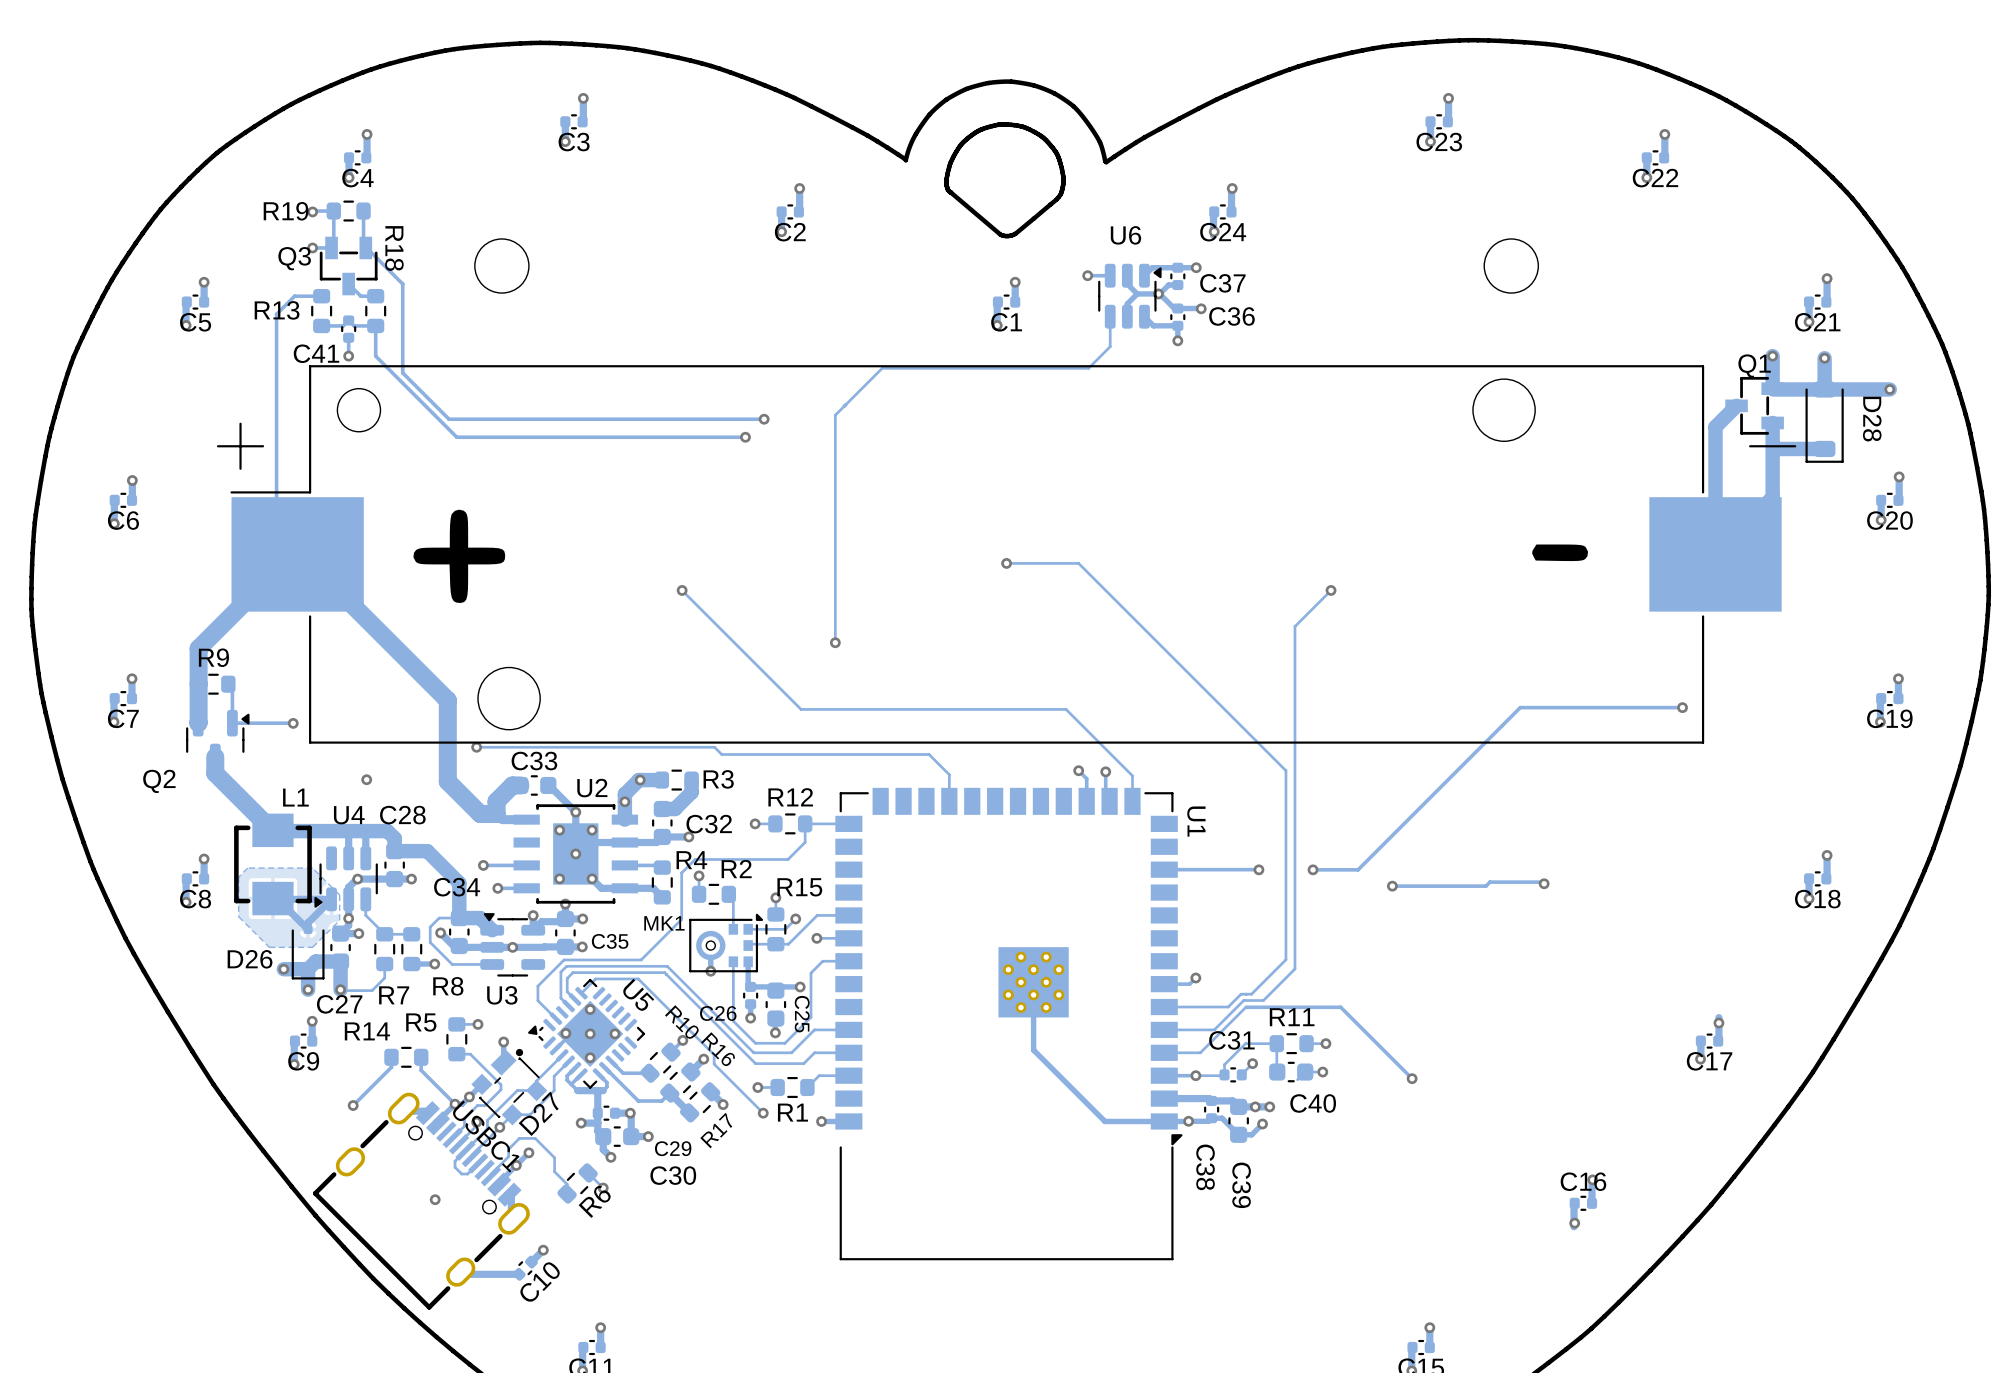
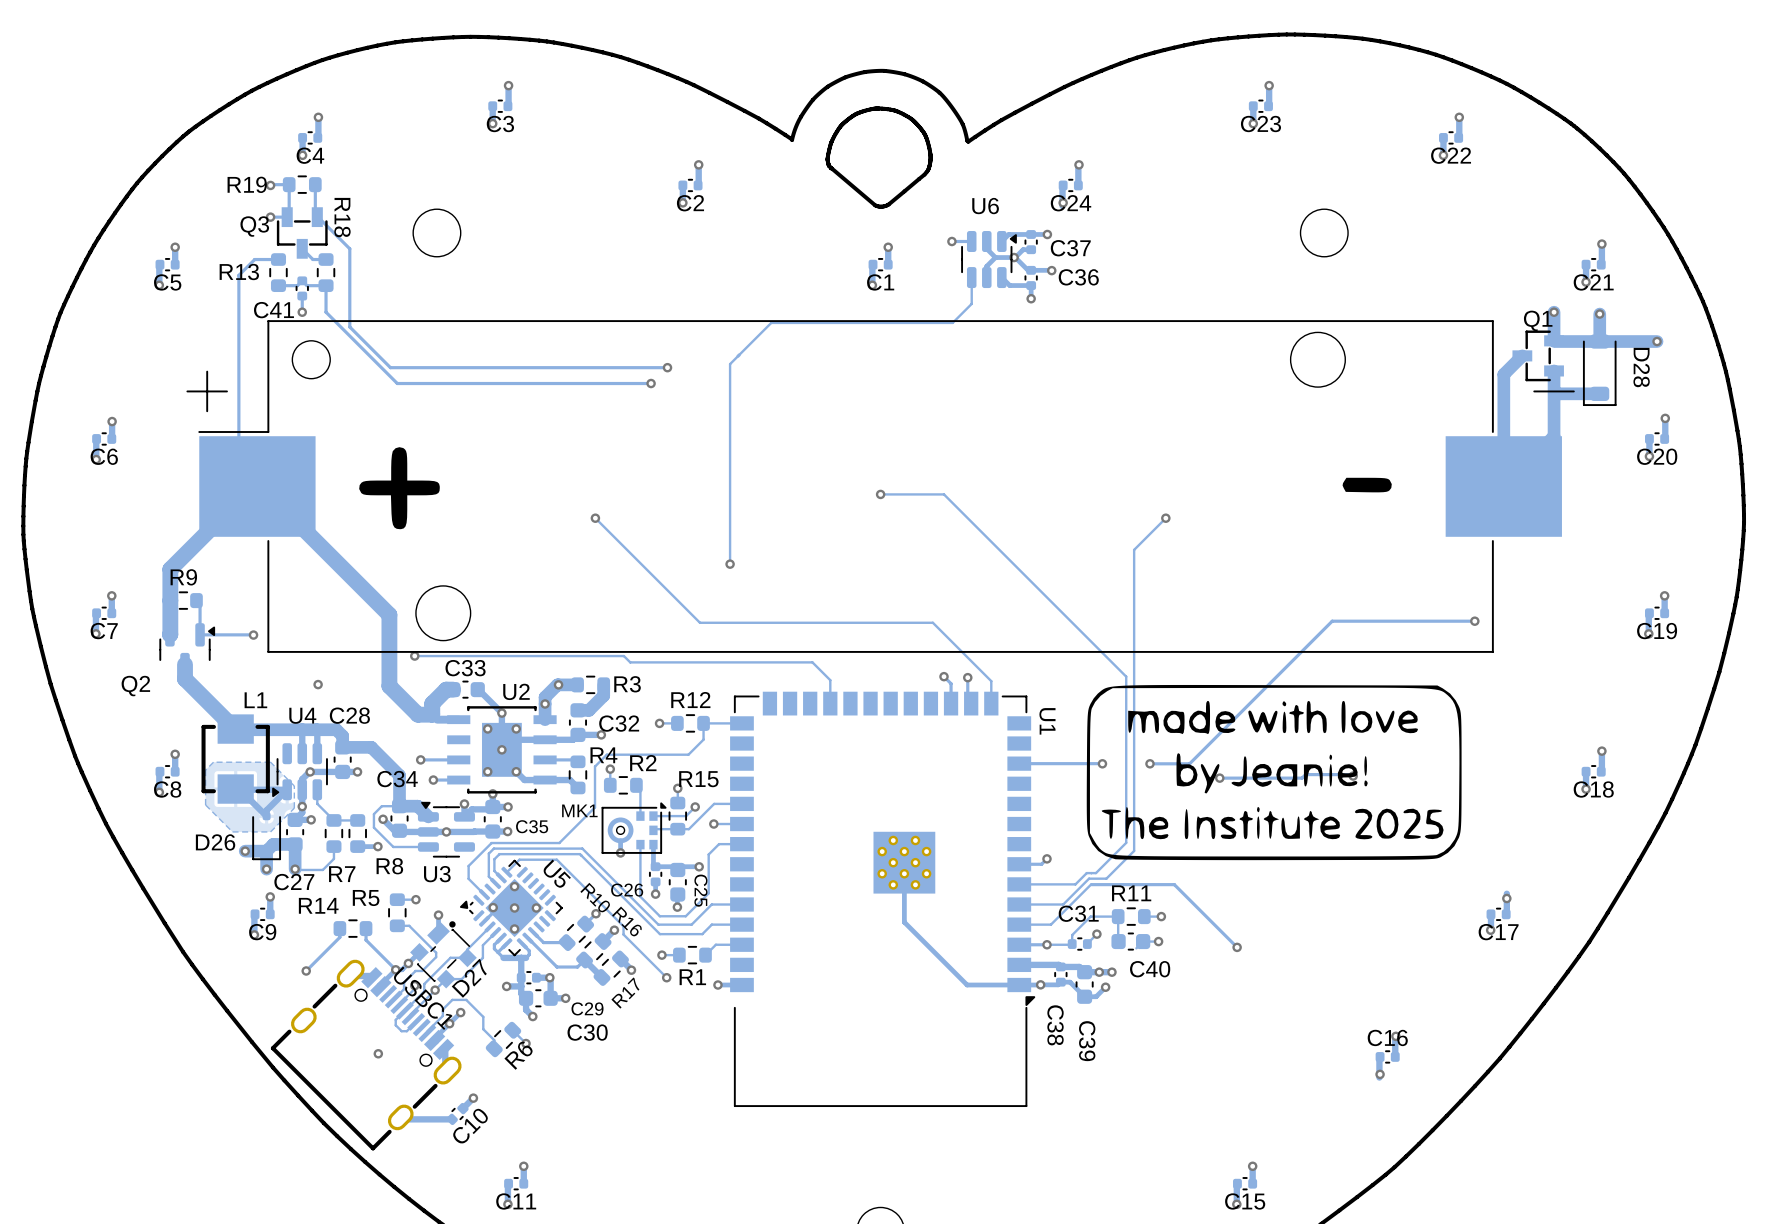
drawing: none -> [1086, 684, 1462, 861]

